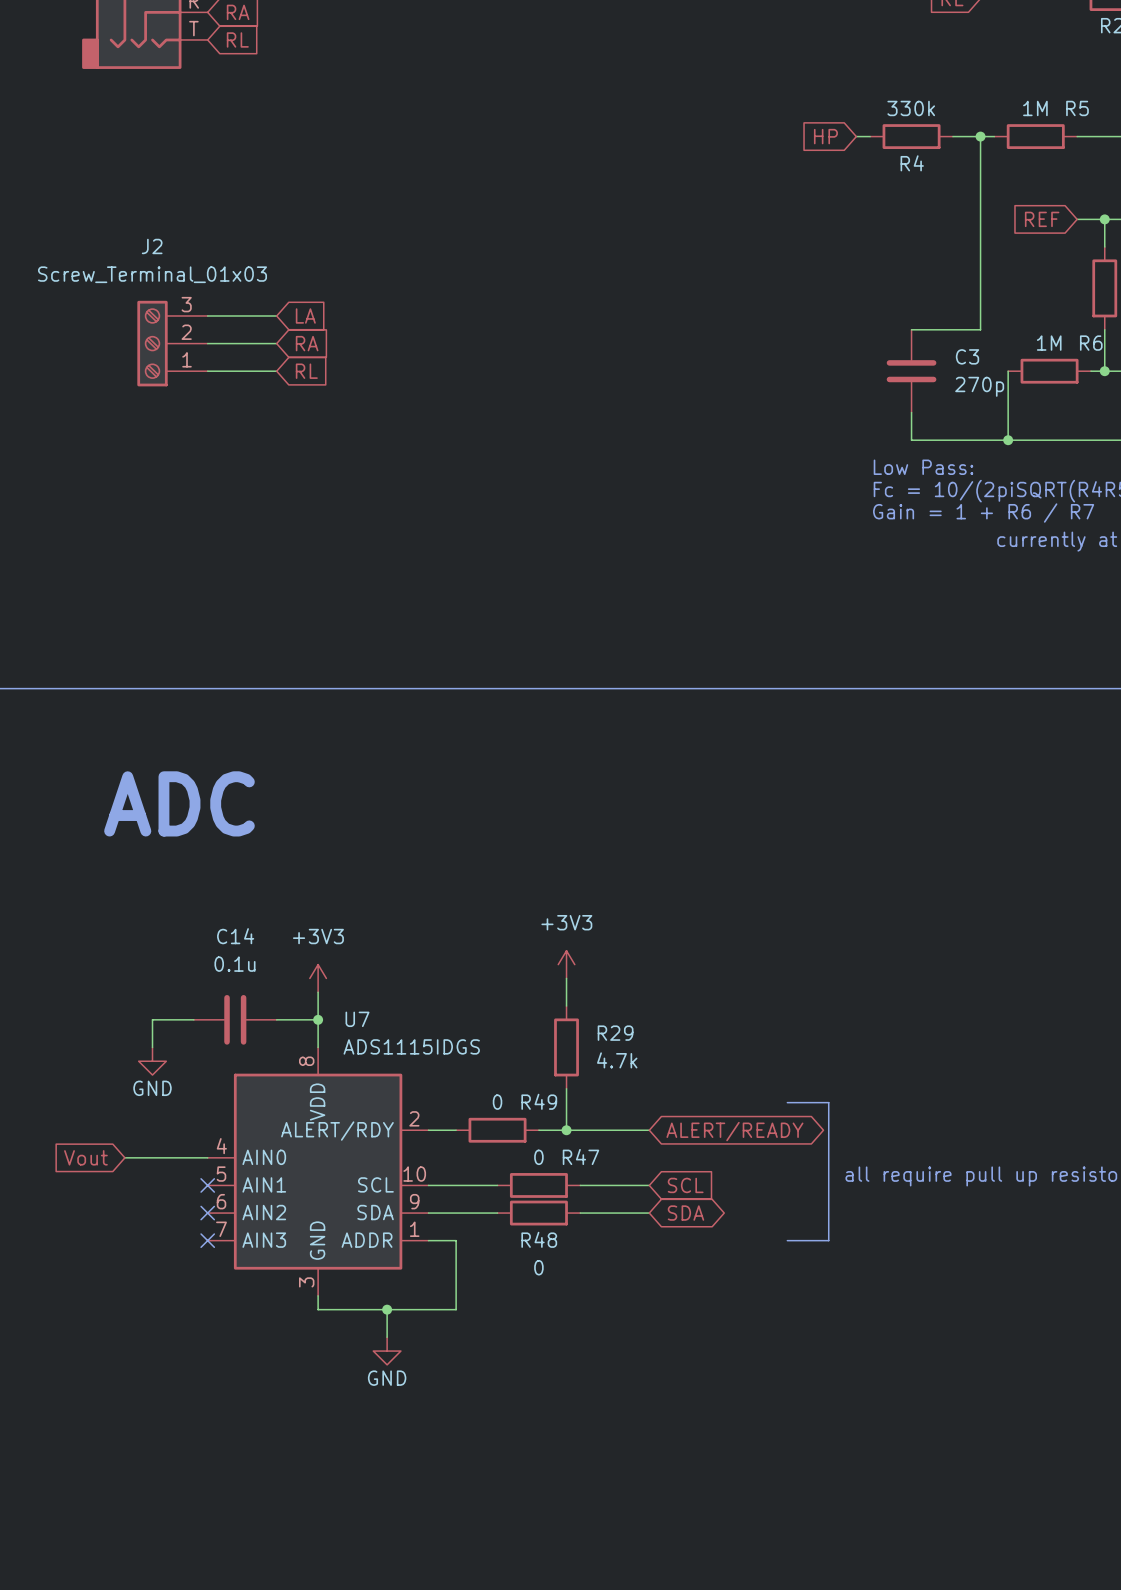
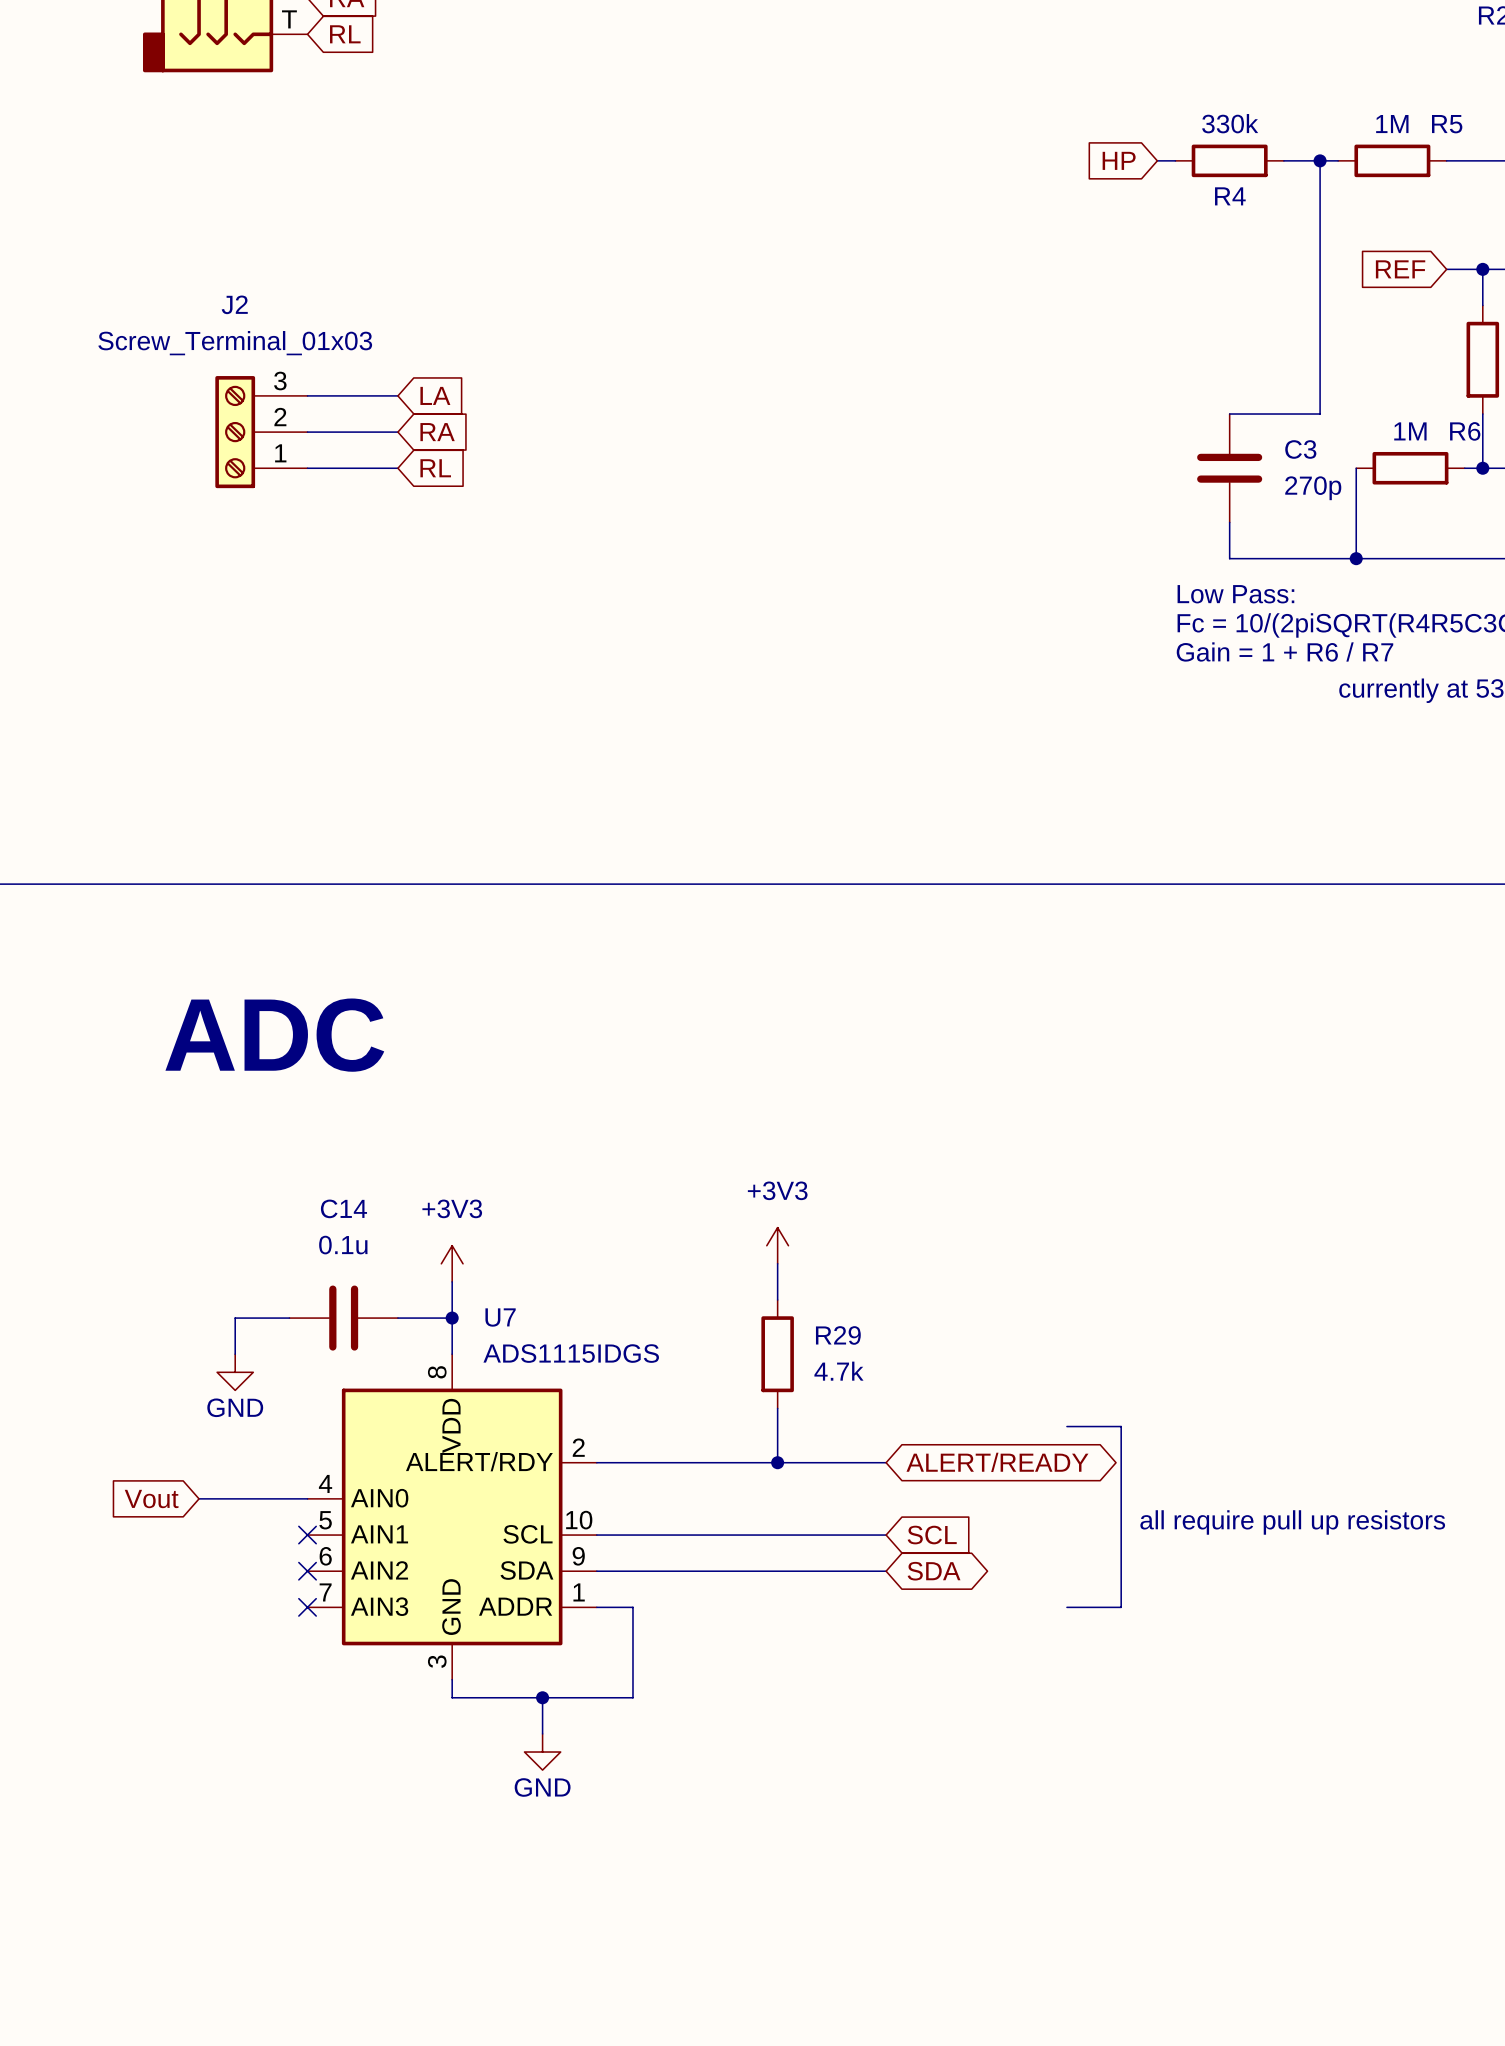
wire: none -> (632, 1462) (741, 1462)
R49: 0 (497, 1130) -> none
wire: none -> (687, 1535) (795, 1535)
R47: 0 (538, 1185) -> none
wire: none -> (687, 1571) (795, 1571)
R48: 0 (538, 1213) -> none

